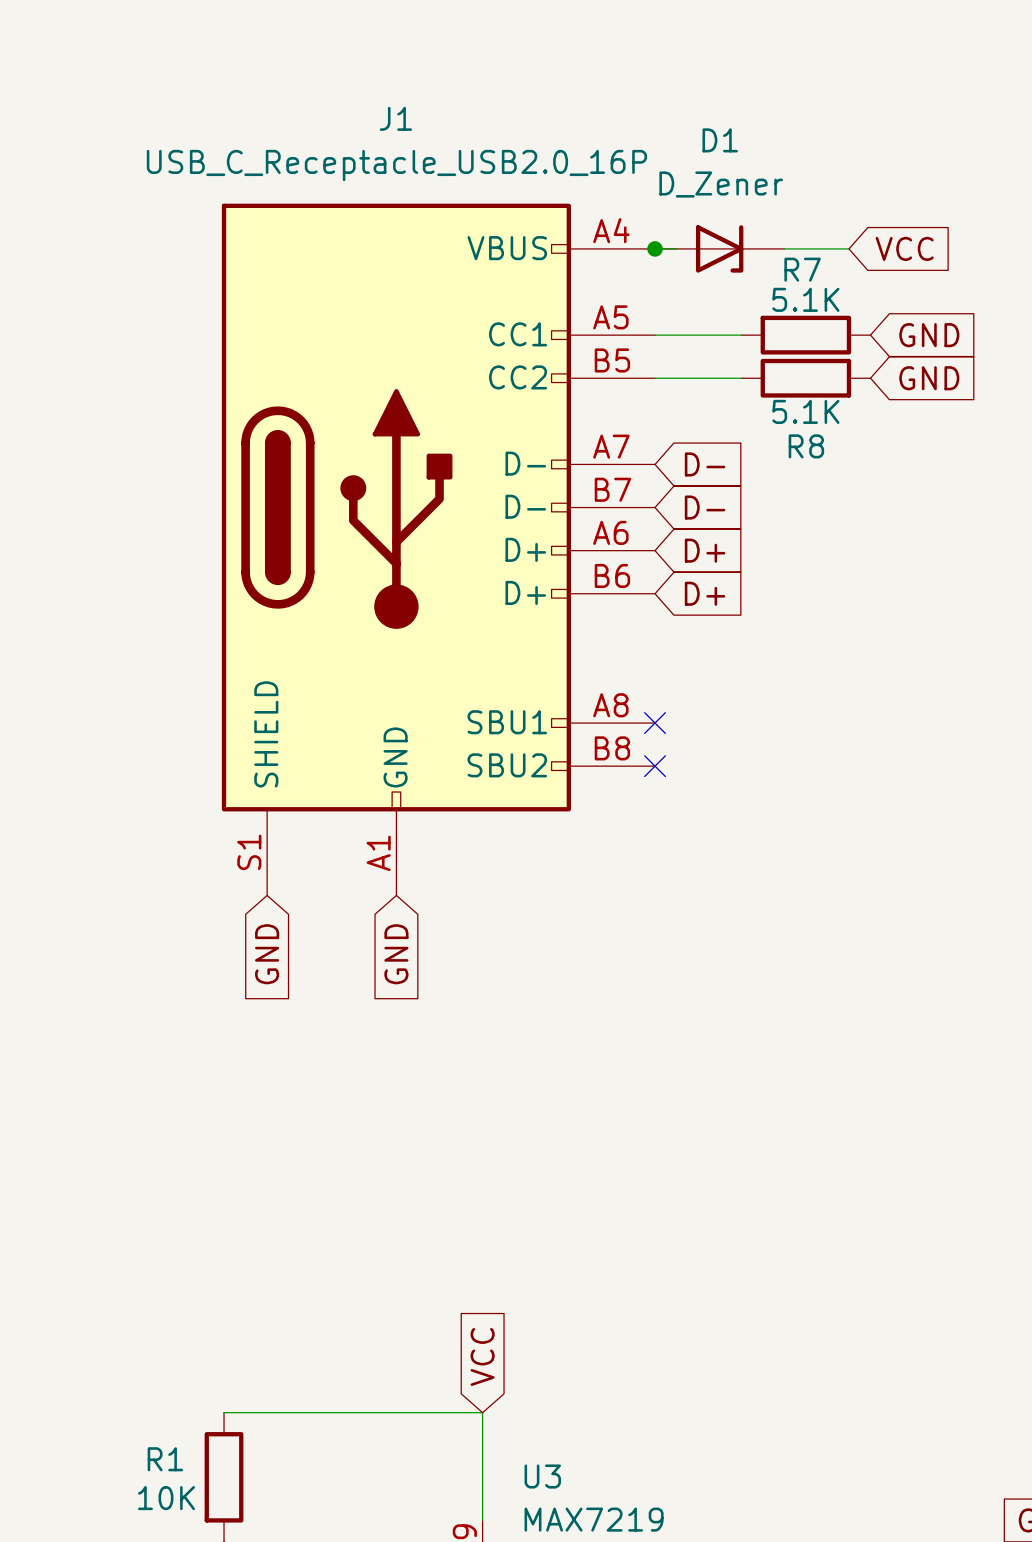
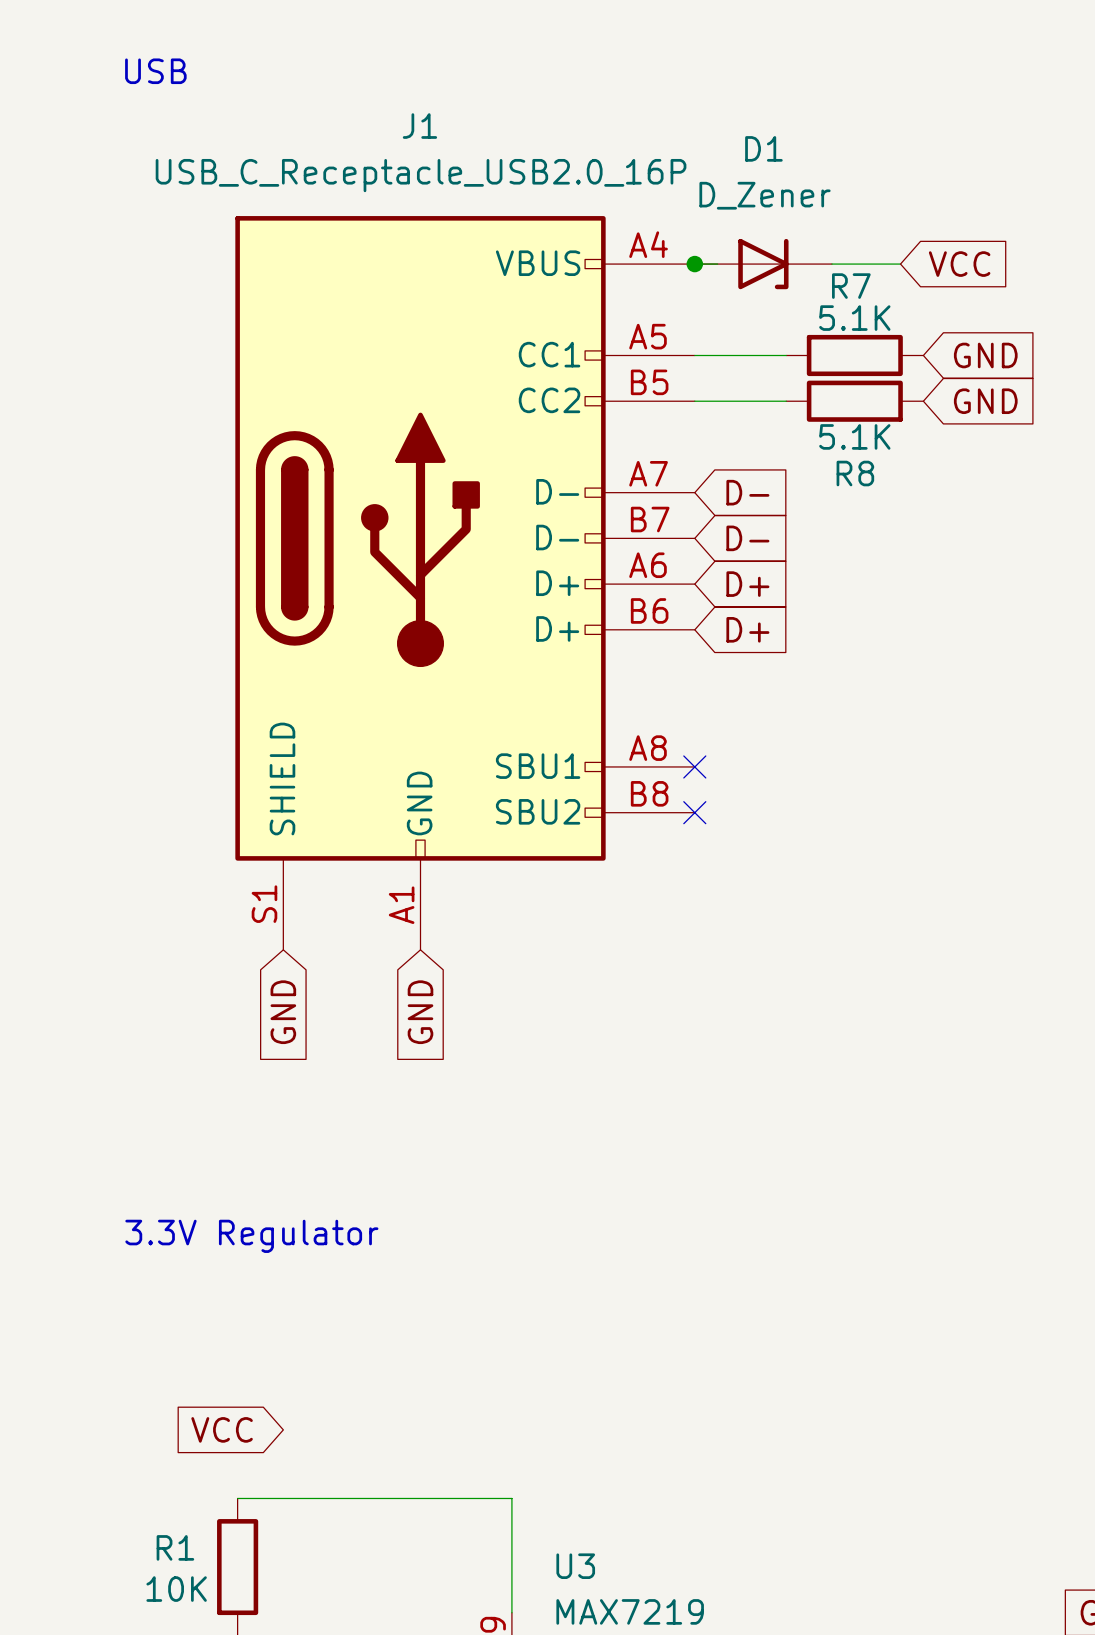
text: none -> USB (155, 71)
text: none -> 3.3V Regulator (251, 1236)
global label rotation: 0° (482, 1356) -> 90° counterclockwise (222, 1429)
global label position: VCC (482, 1356) -> VCC (222, 1429)

